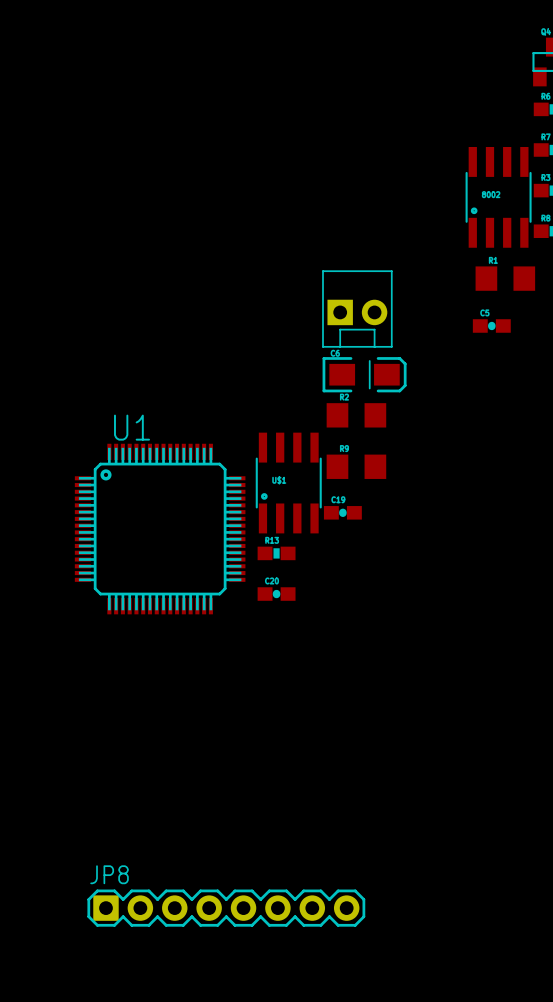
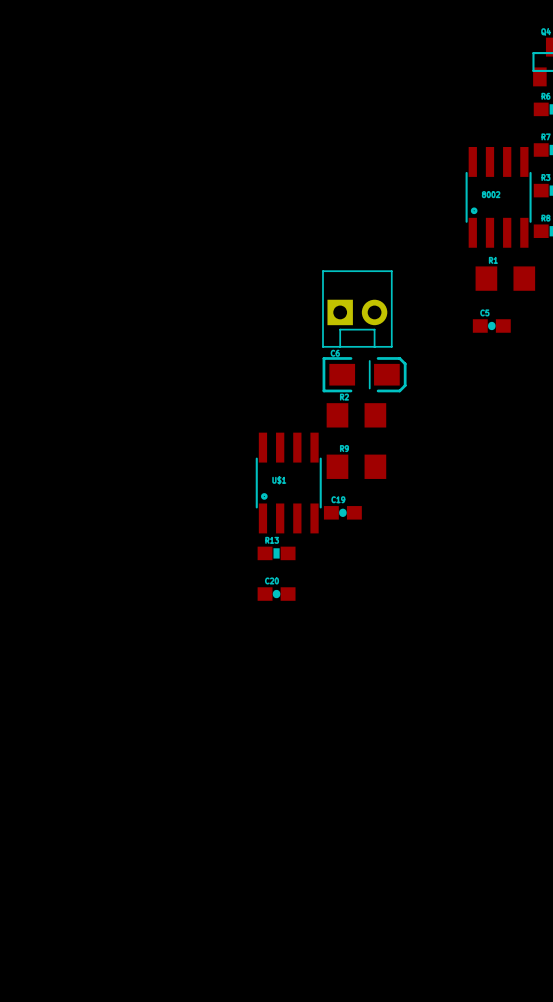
U1: (160, 529) -> none
JP8: (226, 908) -> none

